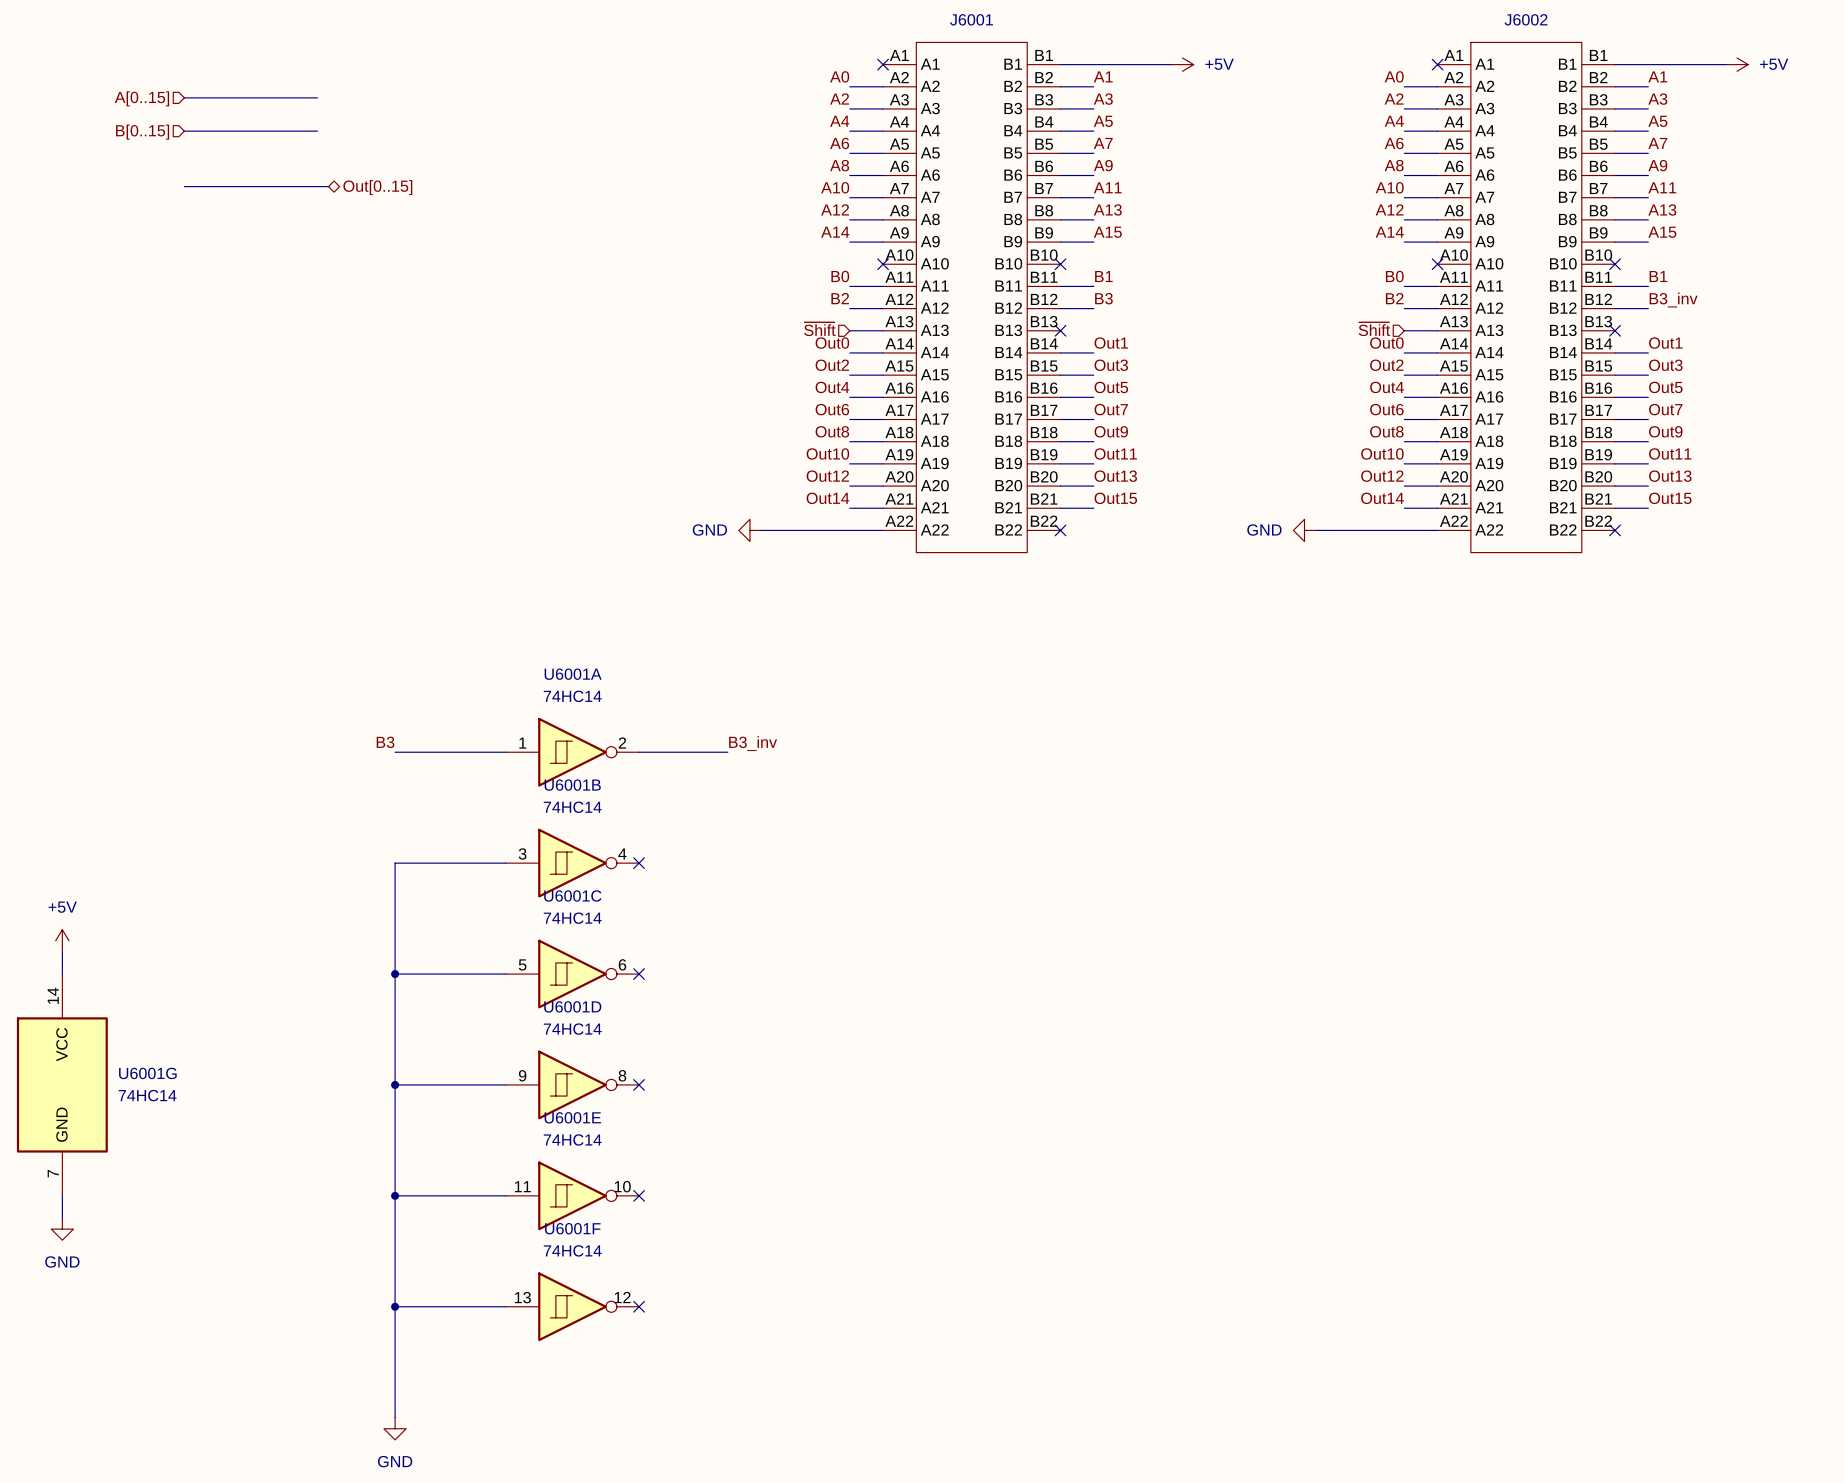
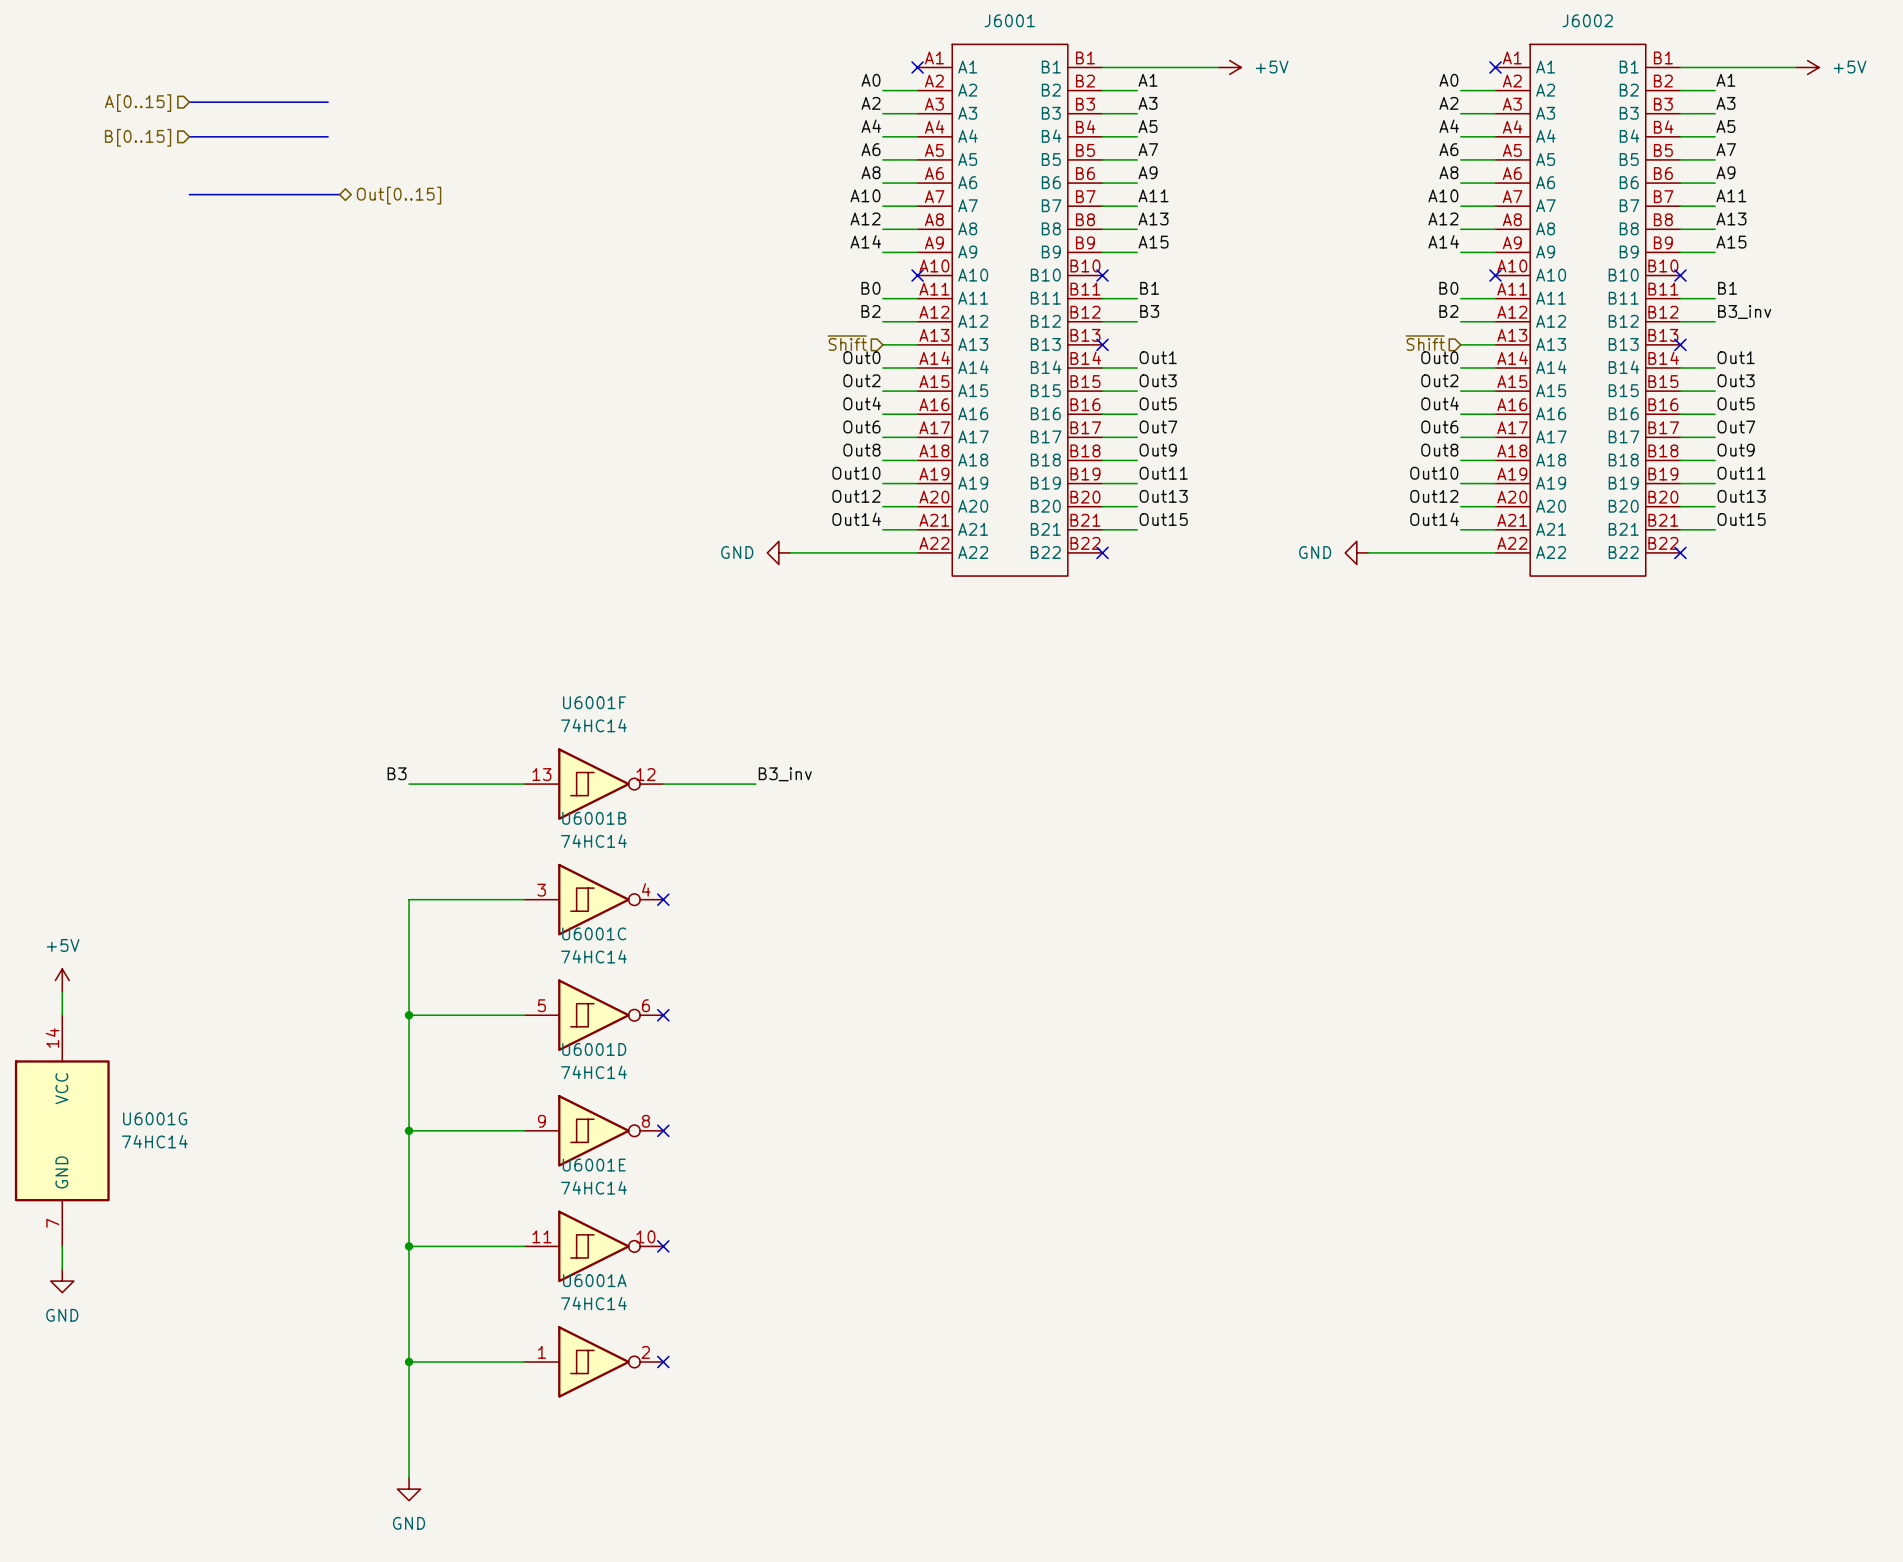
U6001A position: (572, 752) -> (593, 1361)
U6001F position: (572, 1306) -> (593, 784)

